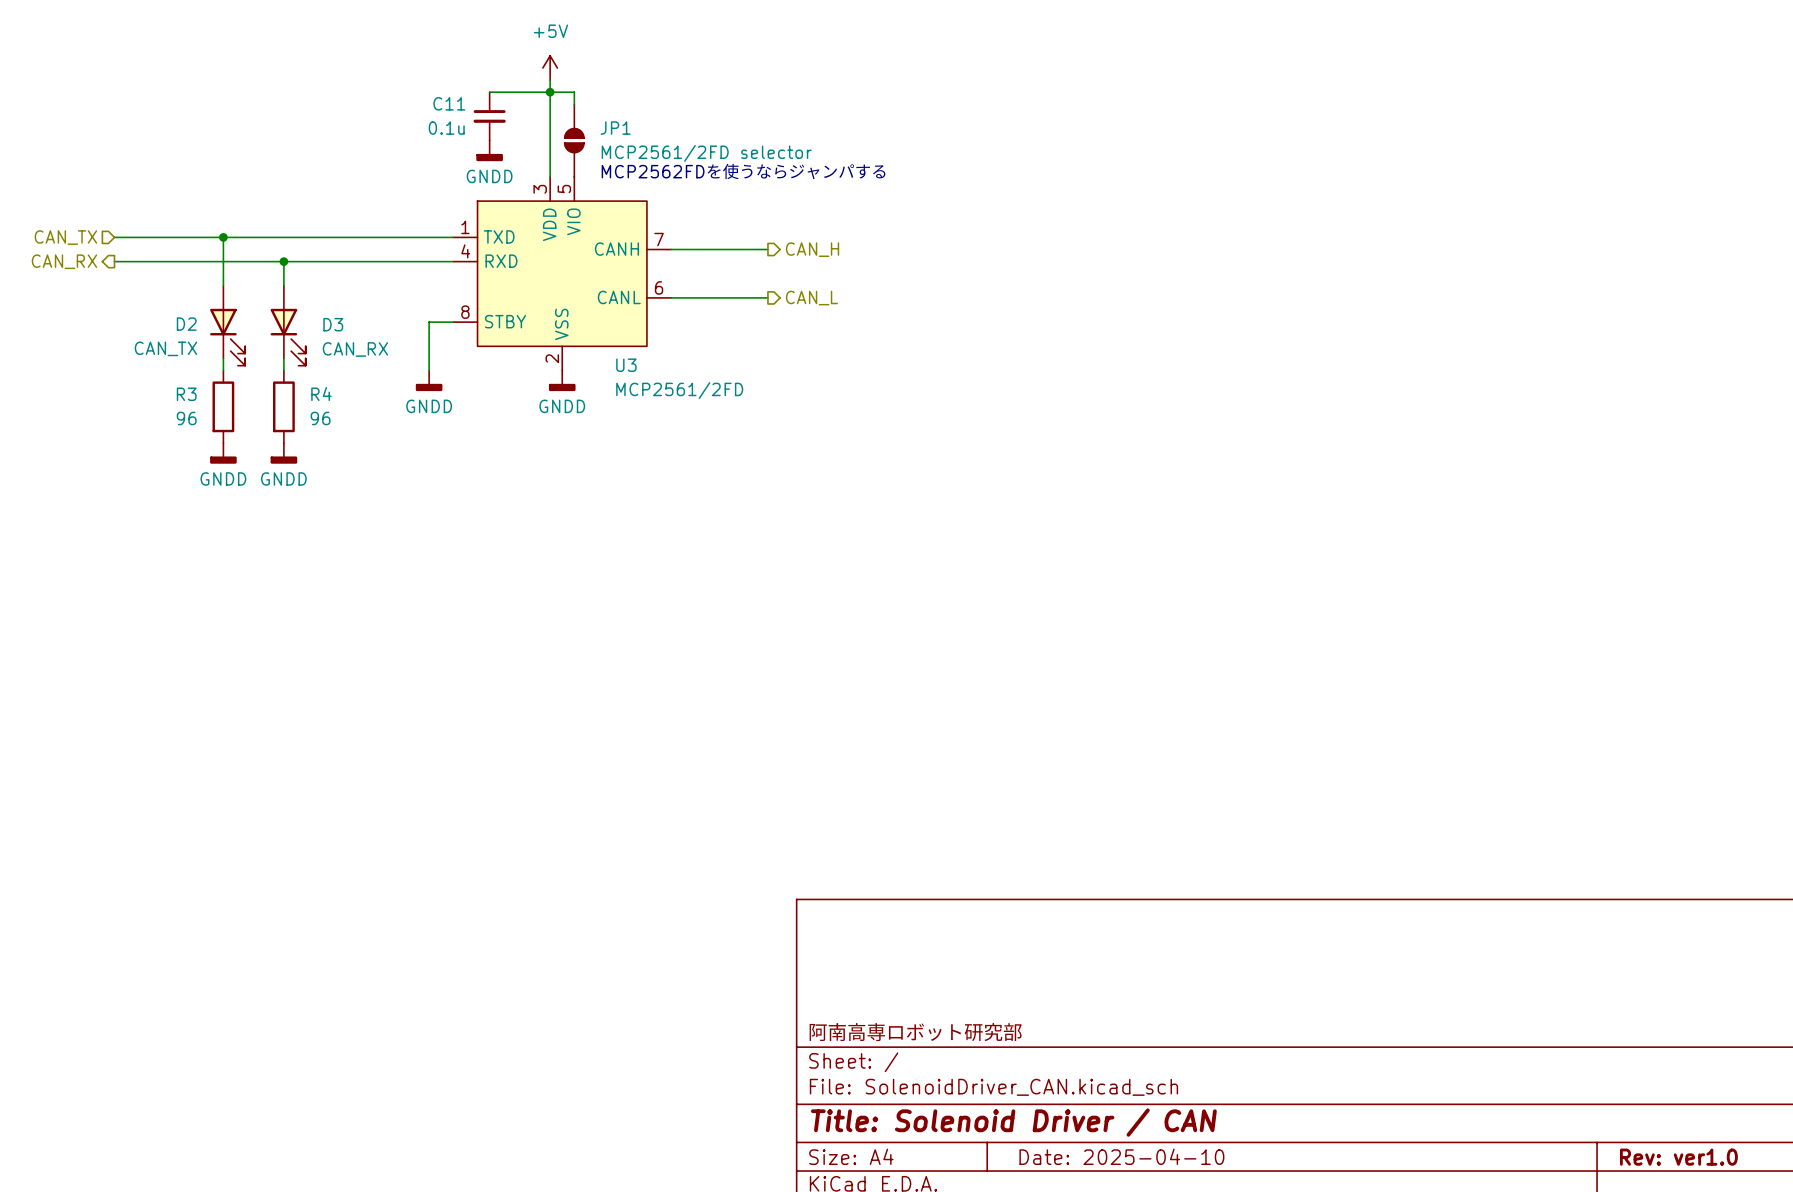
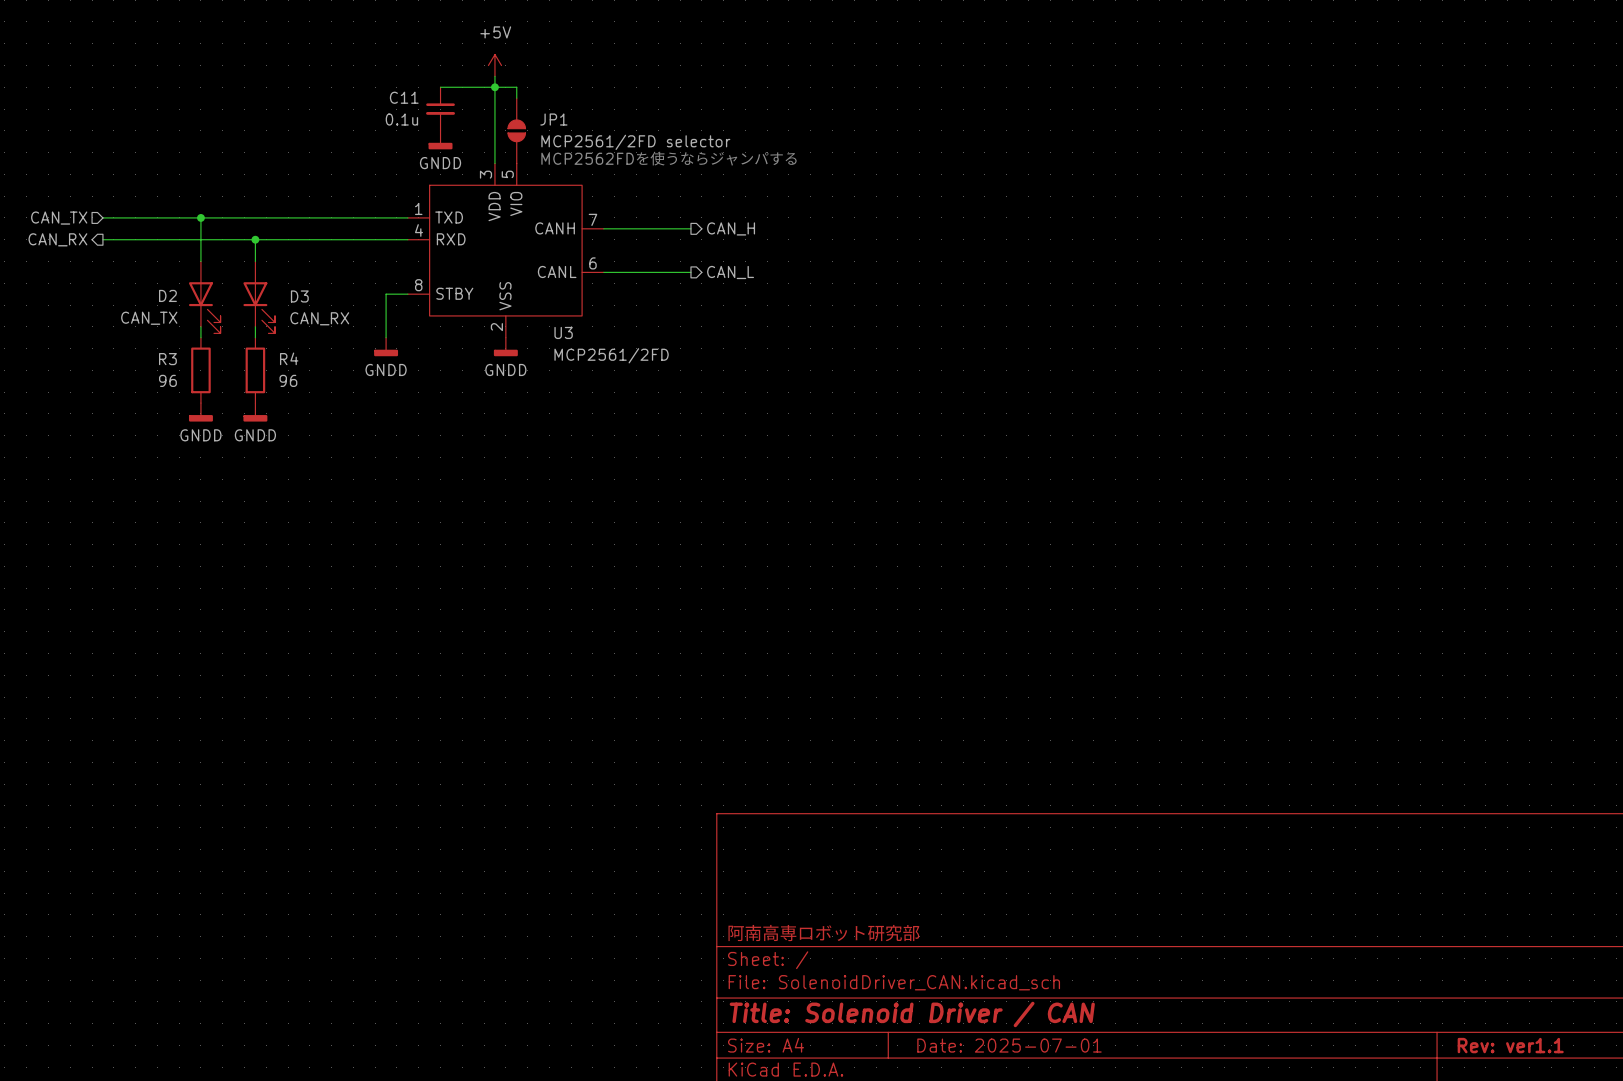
title block: Date: 2025-04-10 (1121, 1156) -> Date: 2025-07-01 (1009, 1045)
title block: Rev: ver1.0 (1678, 1157) -> Rev: ver1.1 (1510, 1045)

